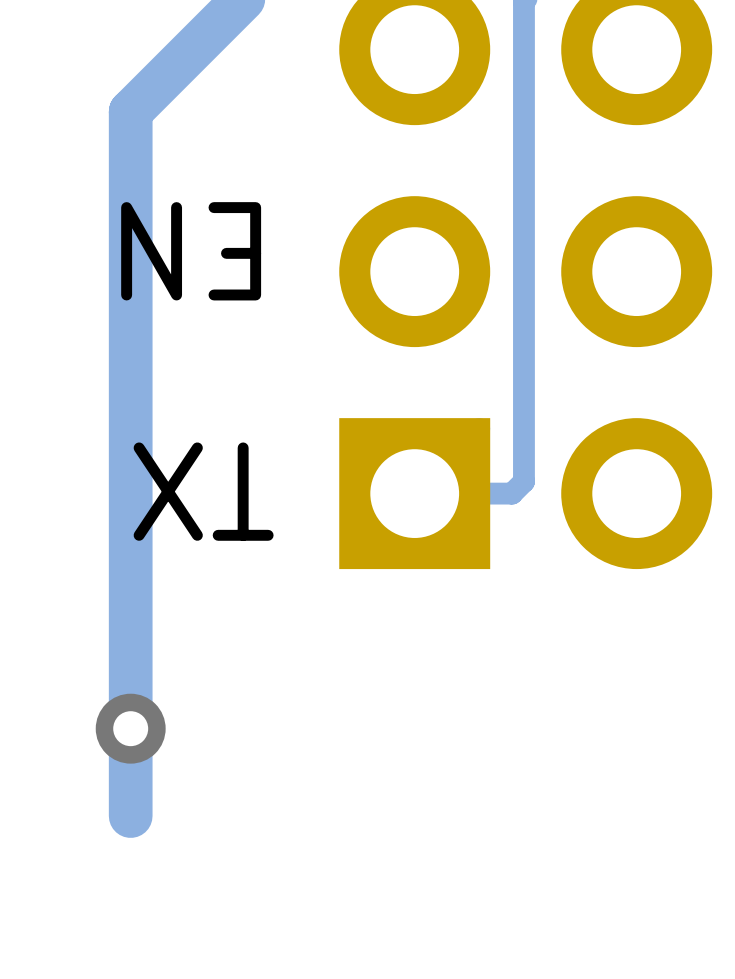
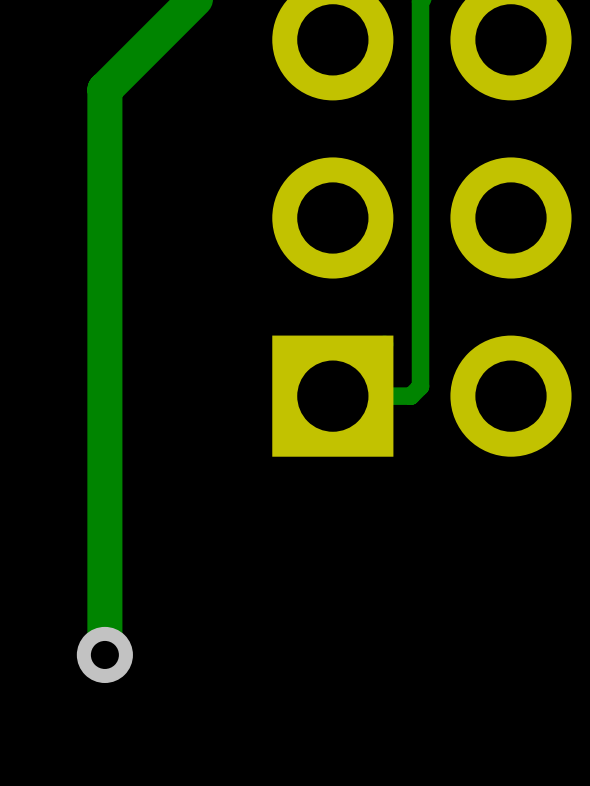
text: EN (191, 251) -> none
text: TX (203, 491) -> none
via position: (130, 728) -> (104, 654)

